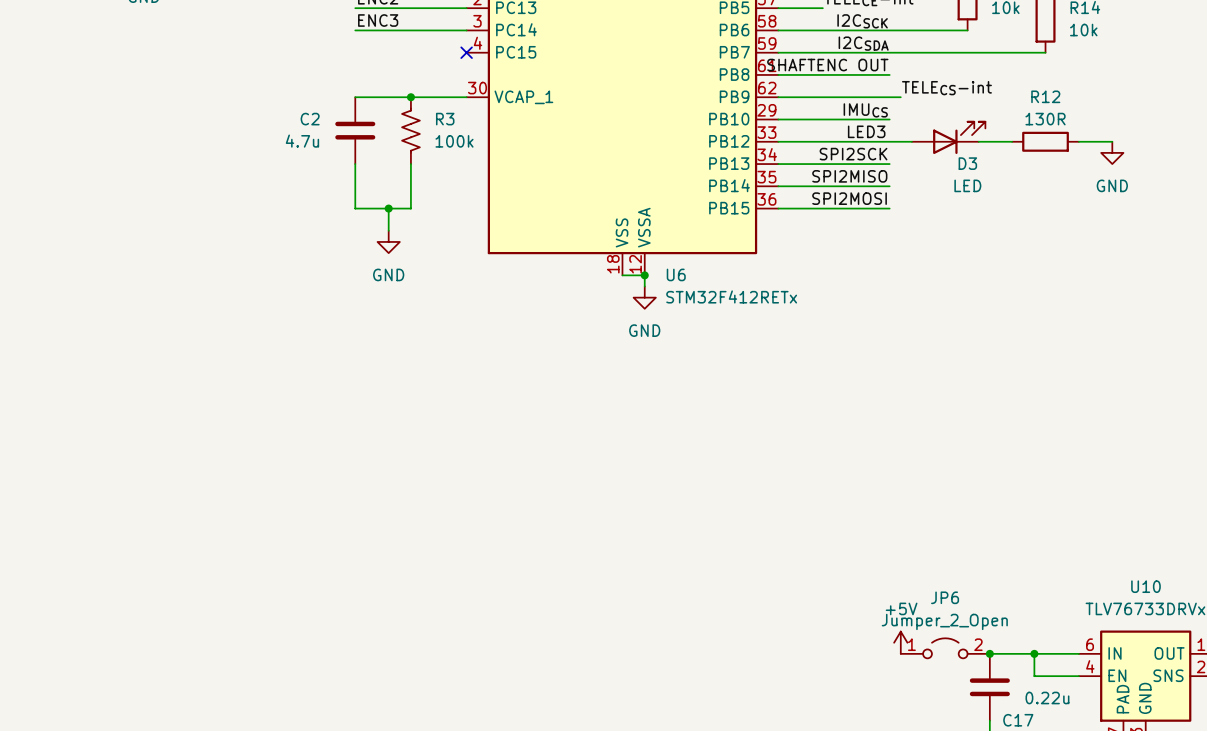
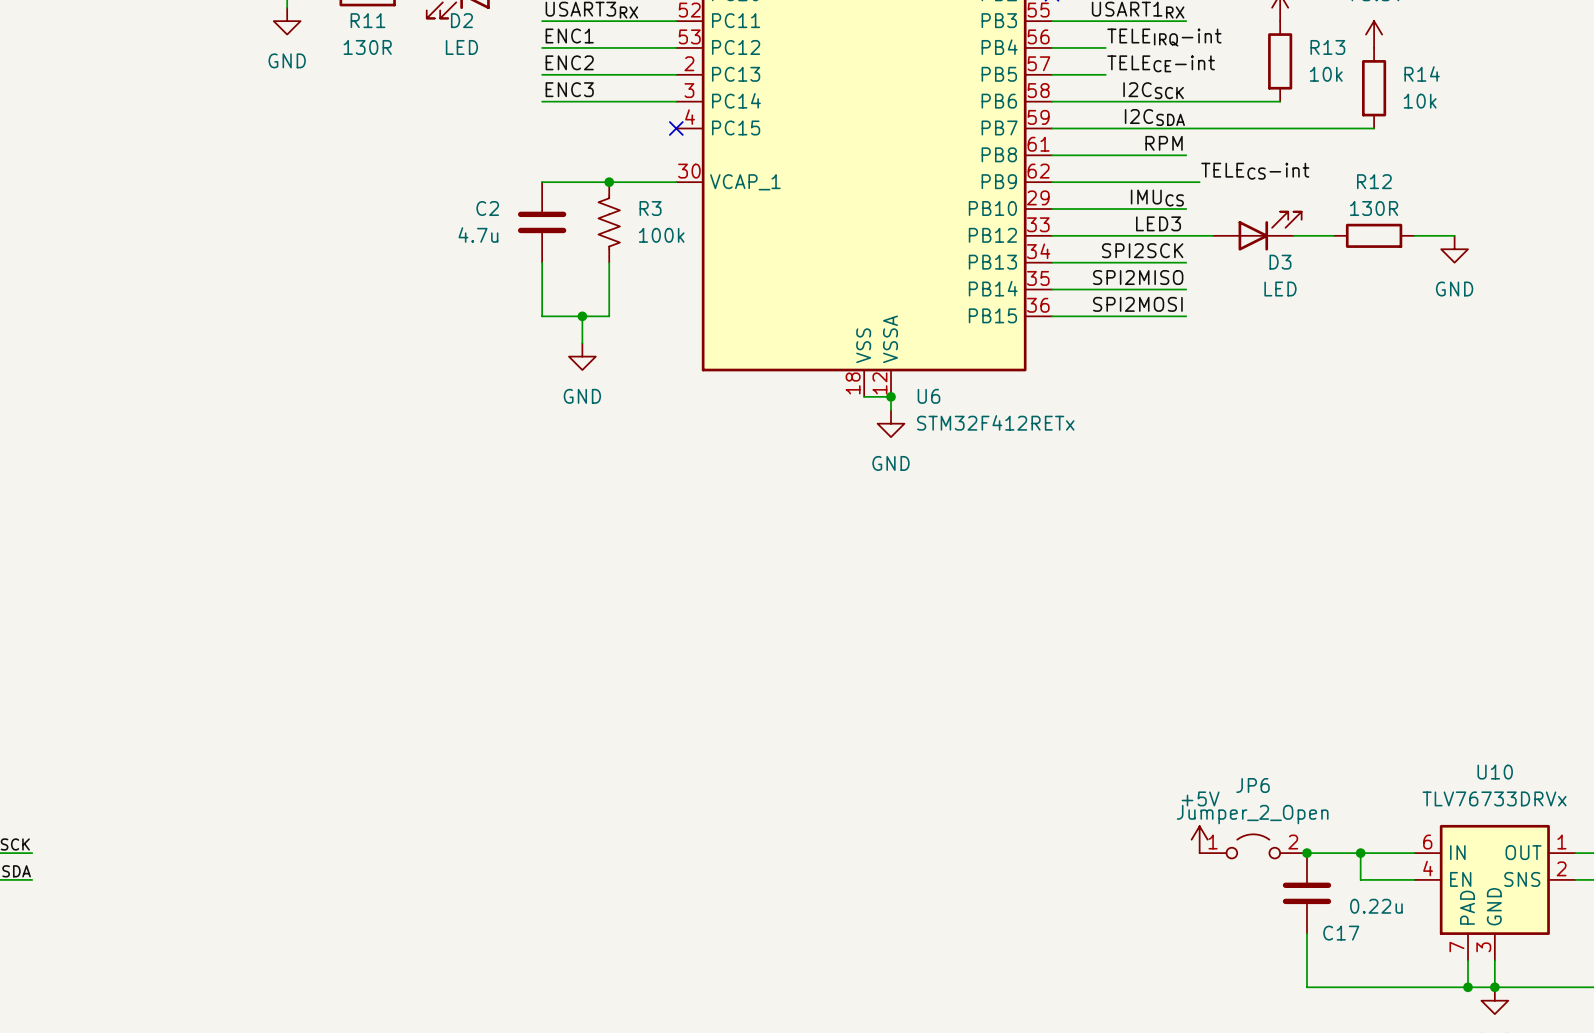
label: SHAFTENC OUT (827, 65) -> RPM (1164, 143)

